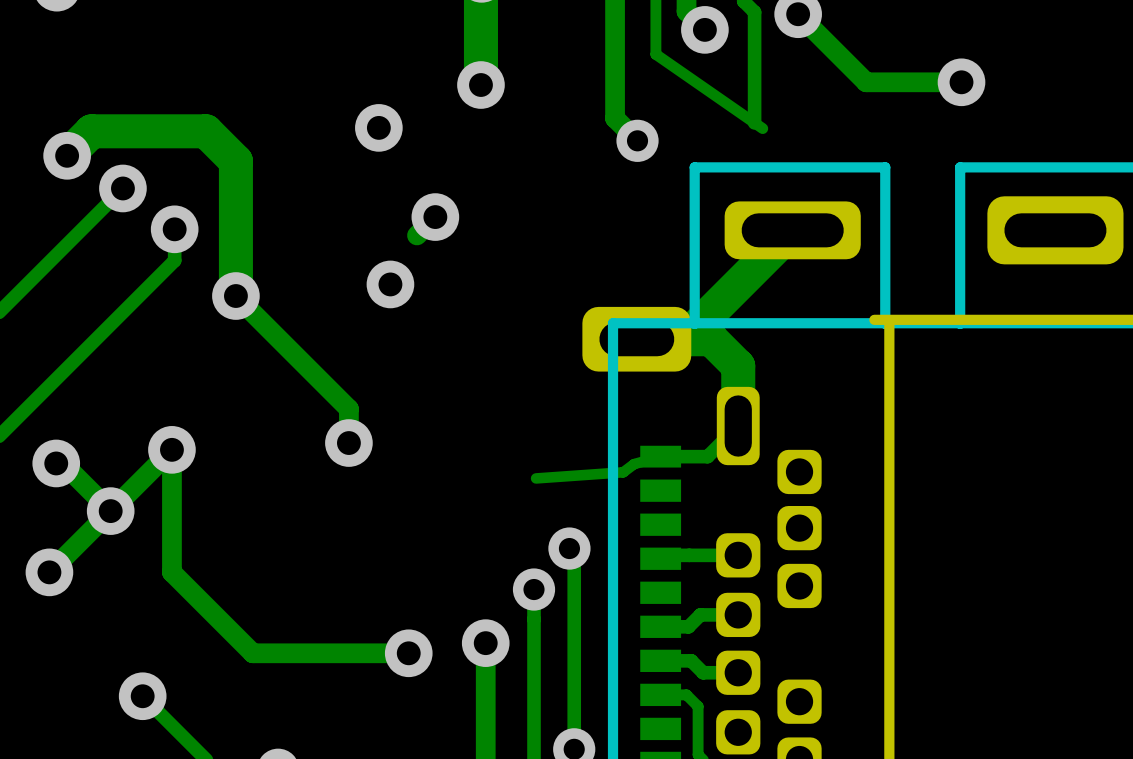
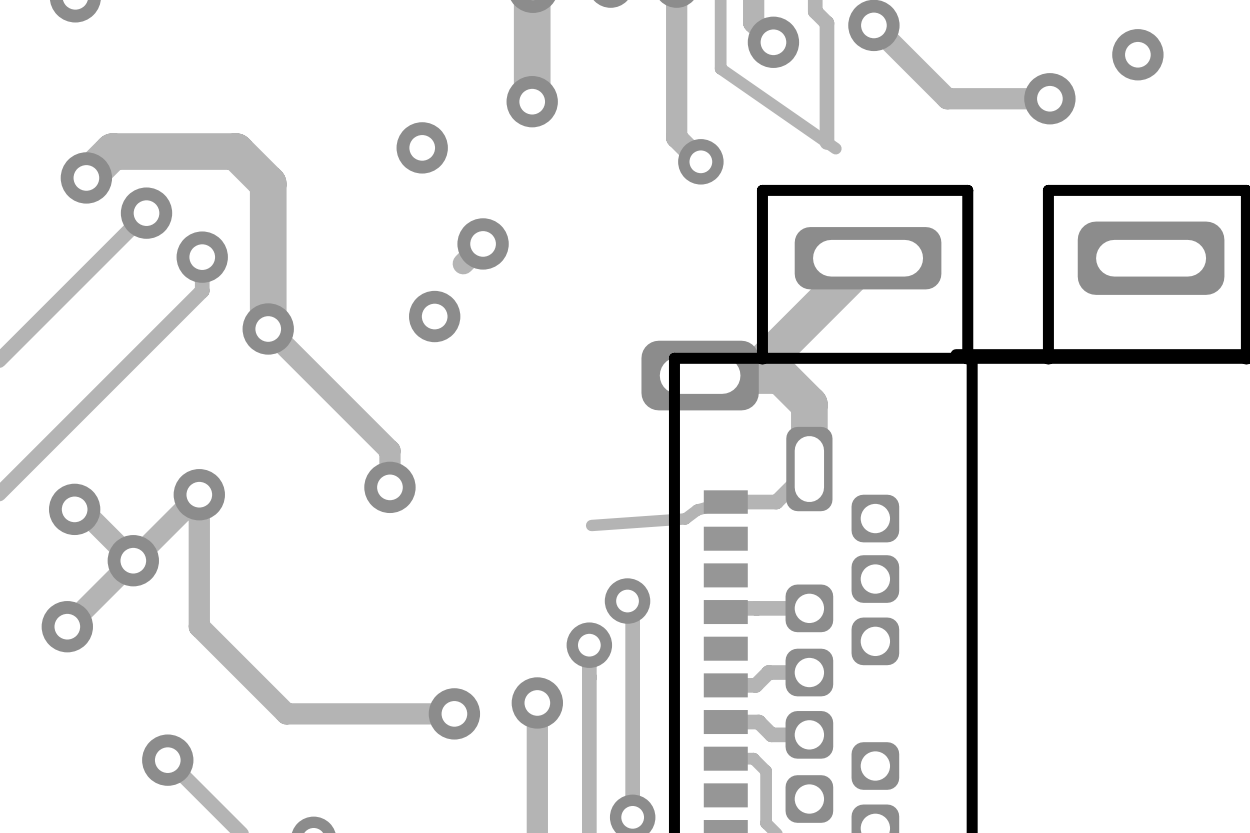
via: none -> (1137, 54)

